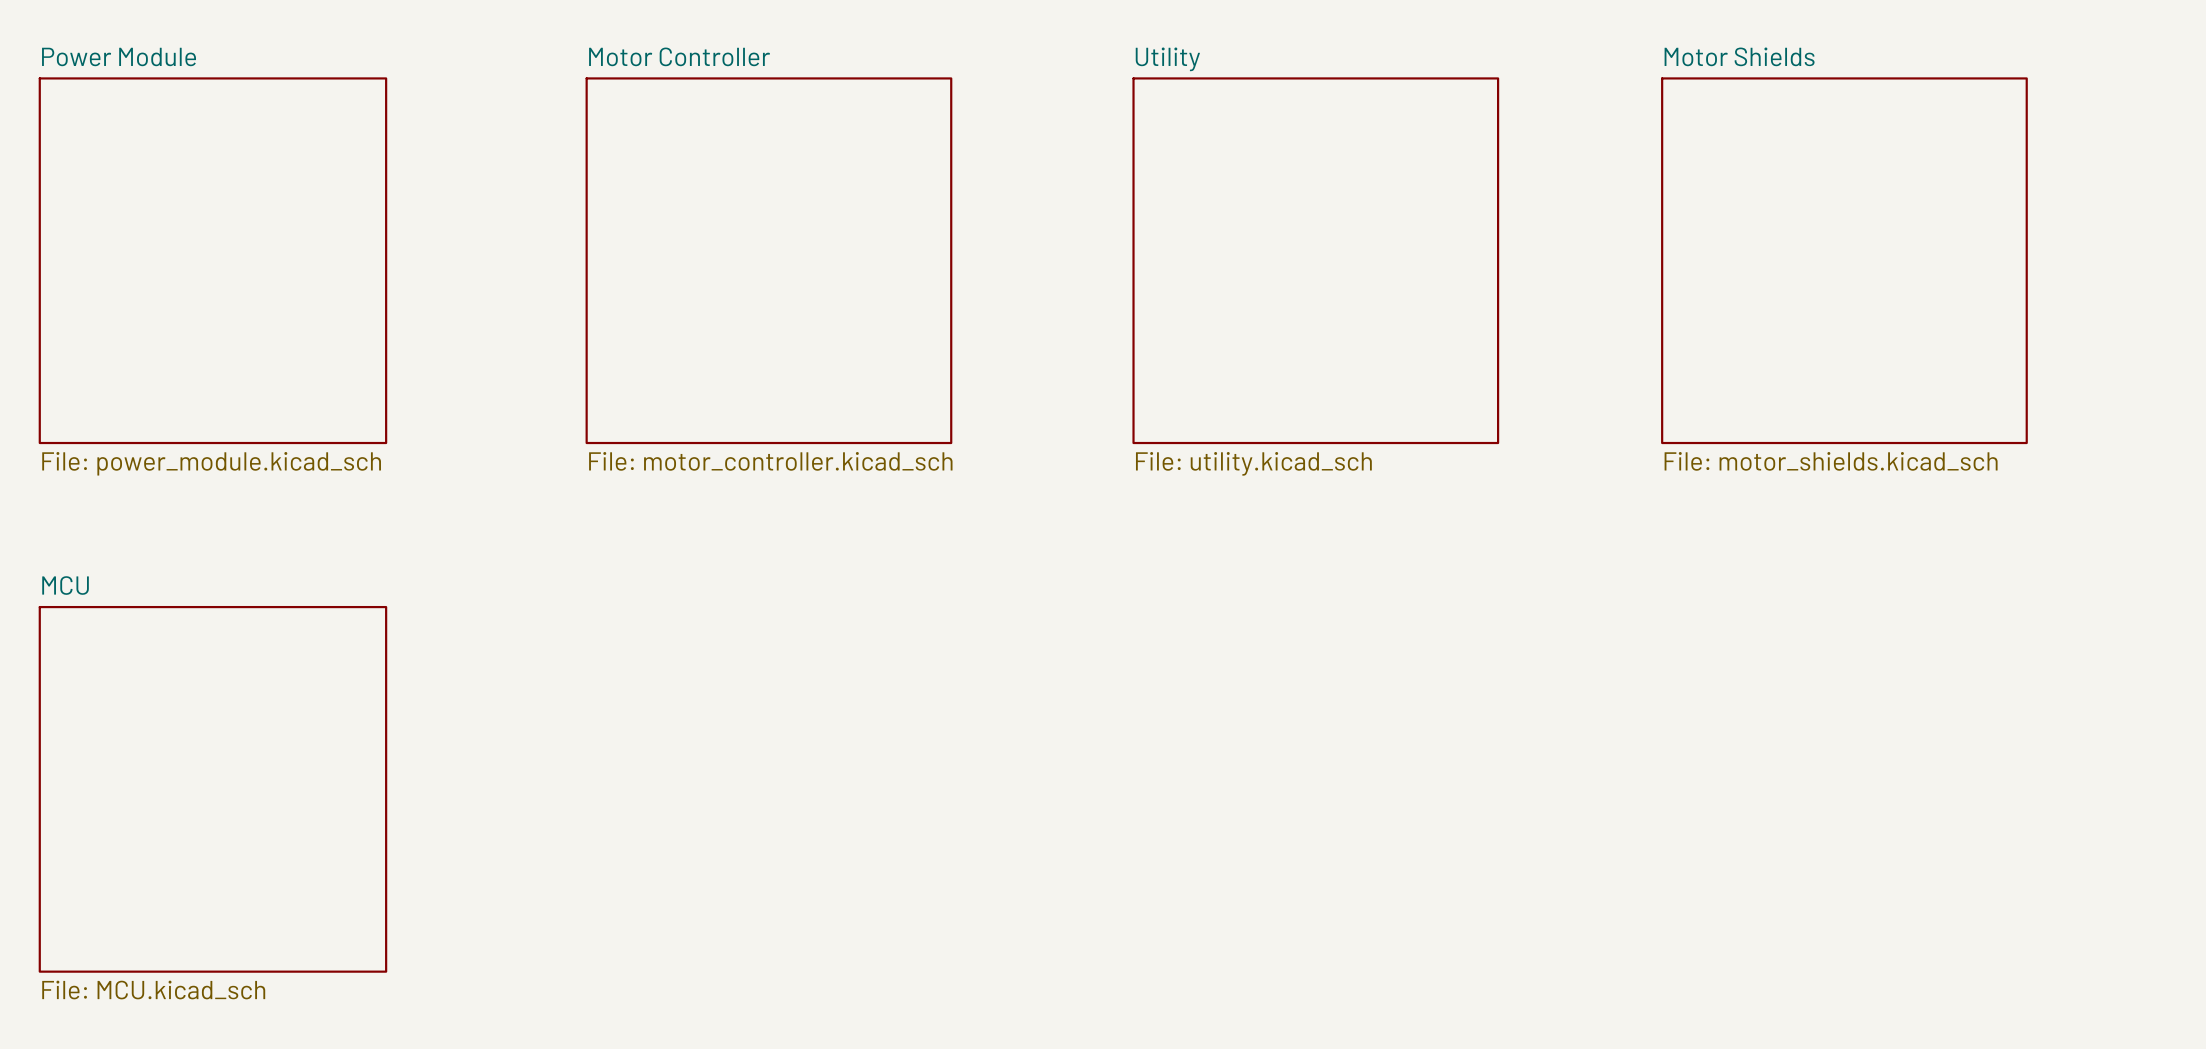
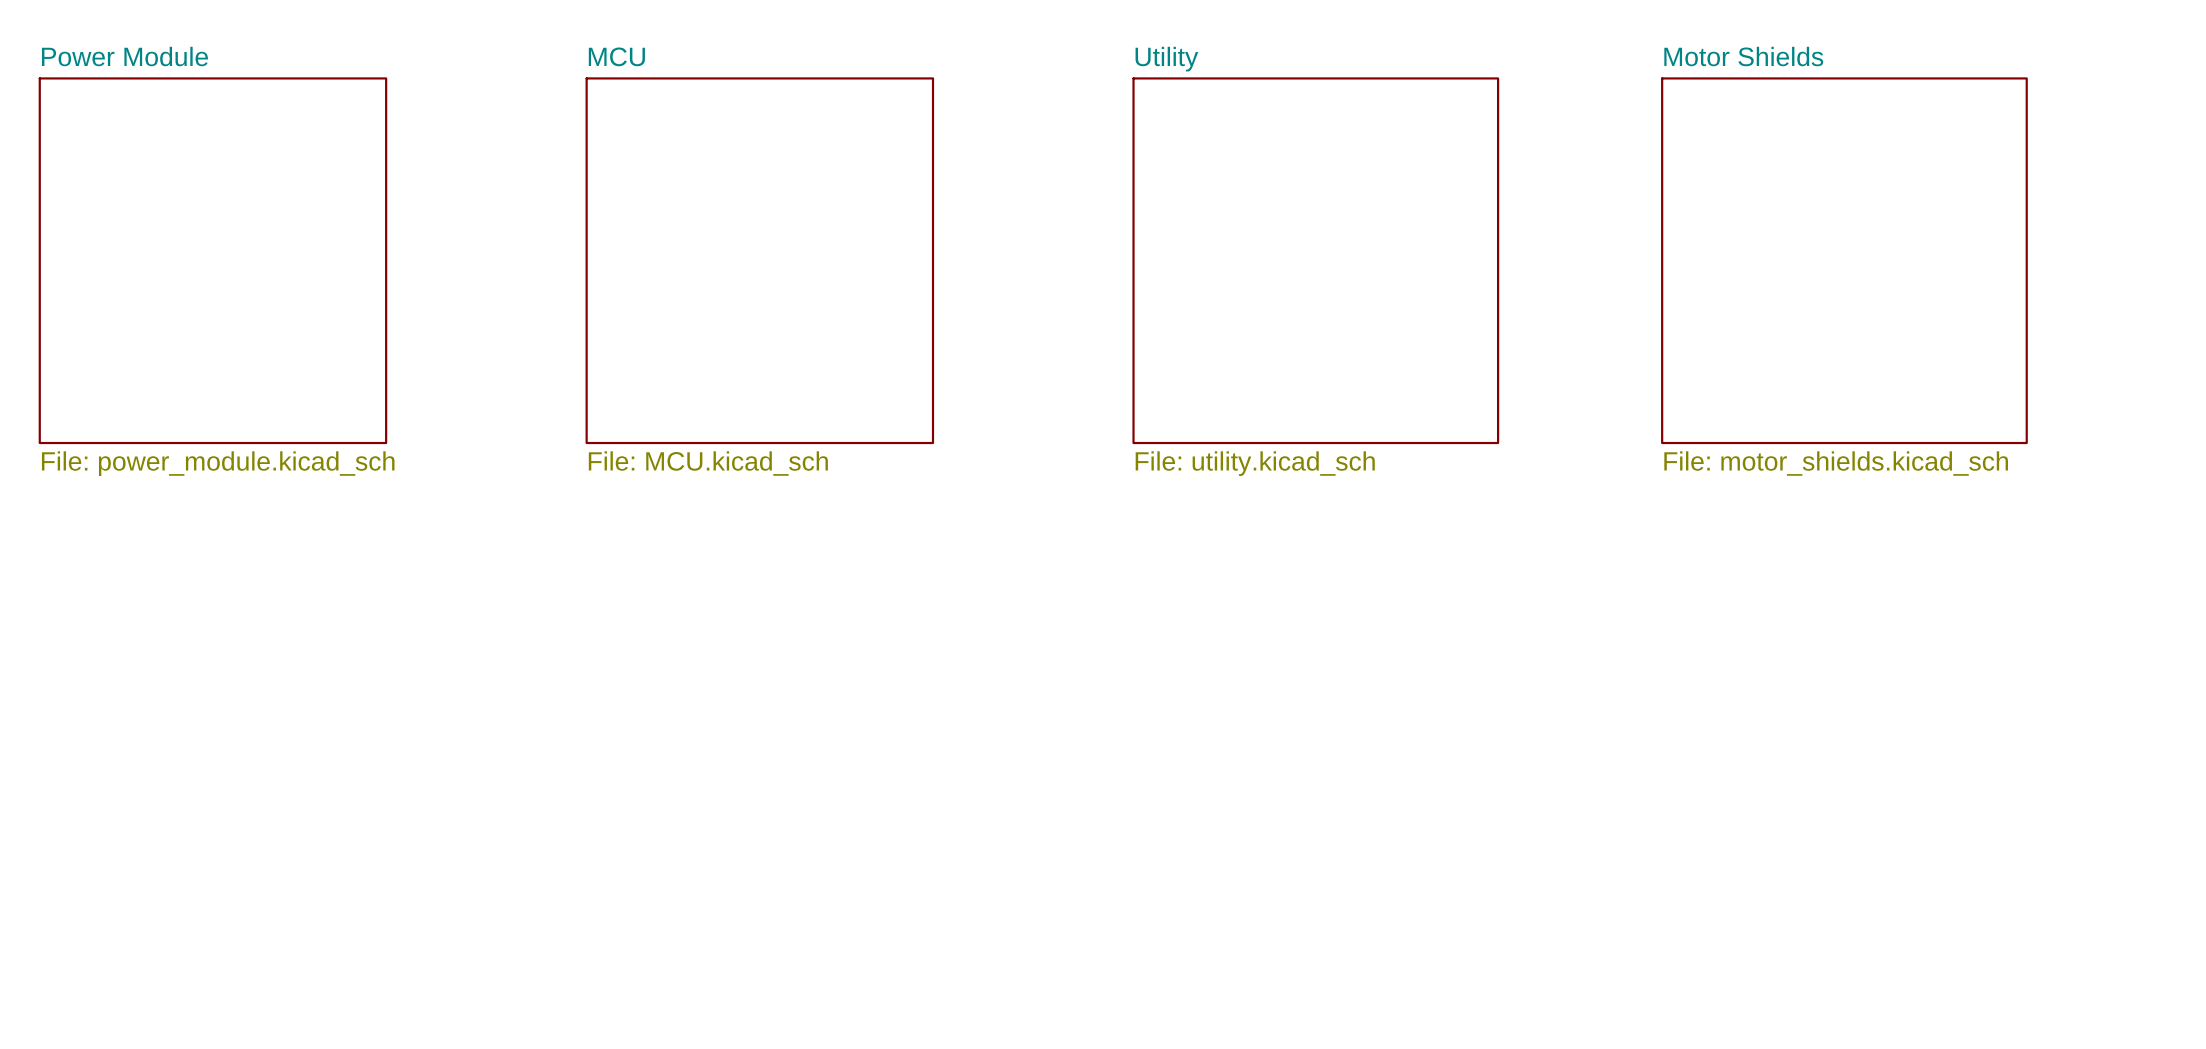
sheet MCU: none -> File: MCU.kicad_sch (759, 260)
sheet Motor Controller: File: motor_controller.kicad_sch (768, 260) -> none
sheet MCU: File: MCU.kicad_sch (212, 789) -> none

